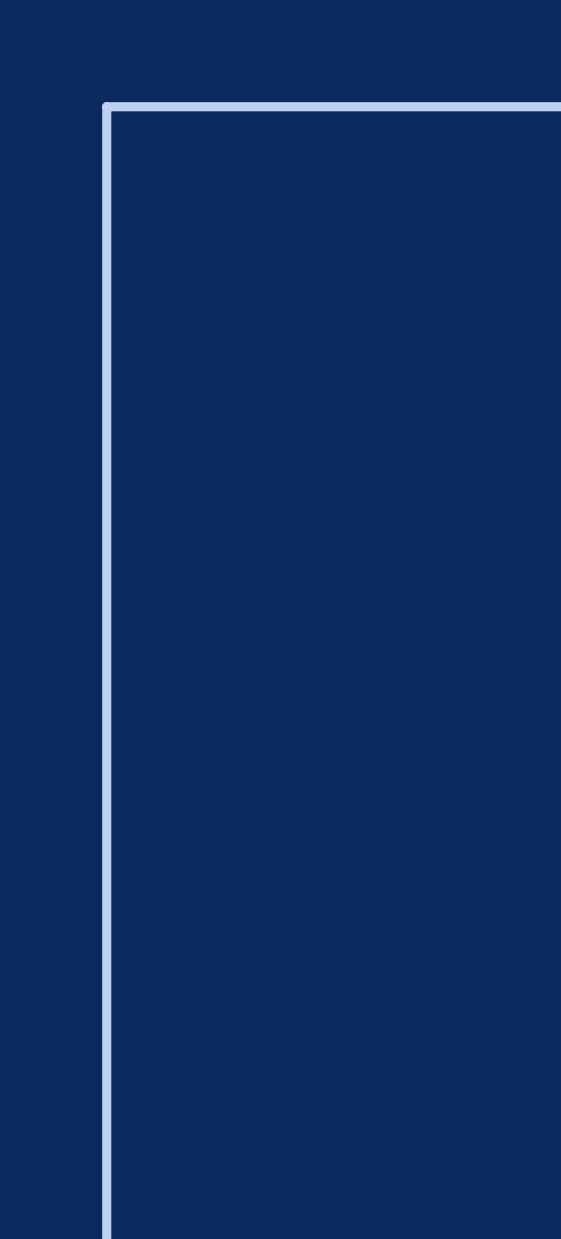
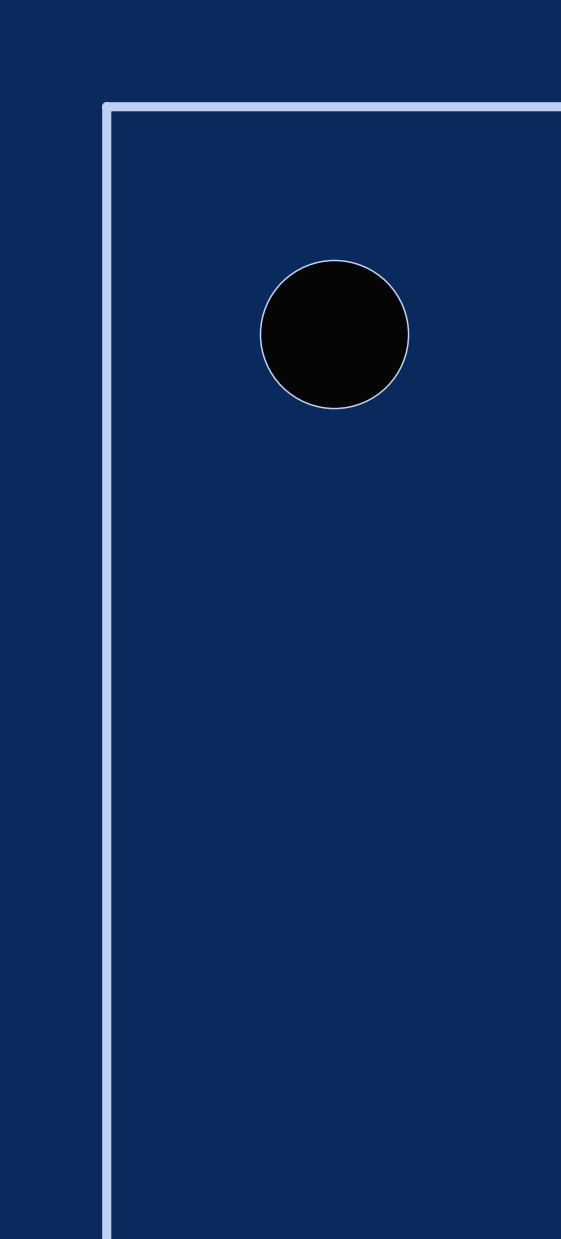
part: none -> (334, 334)

